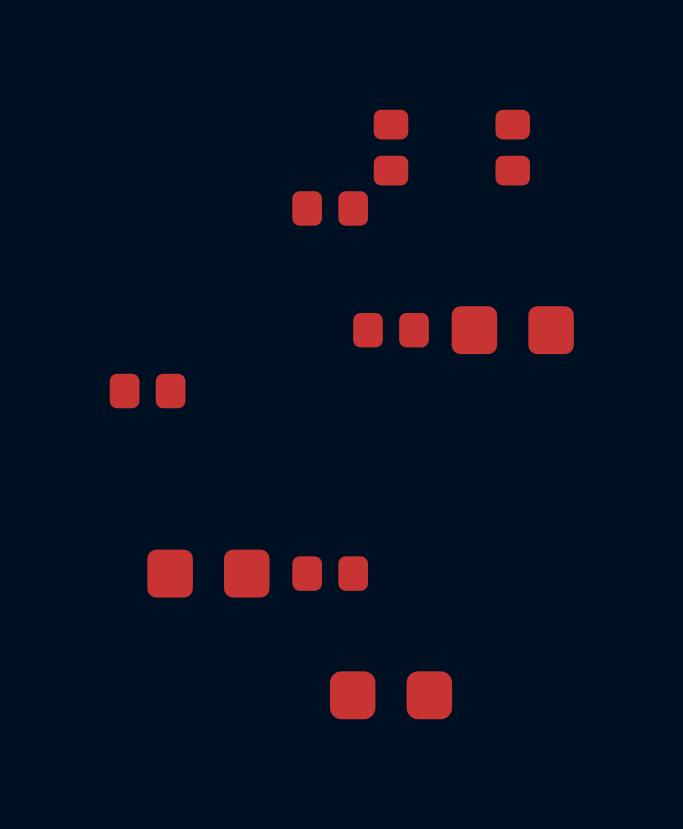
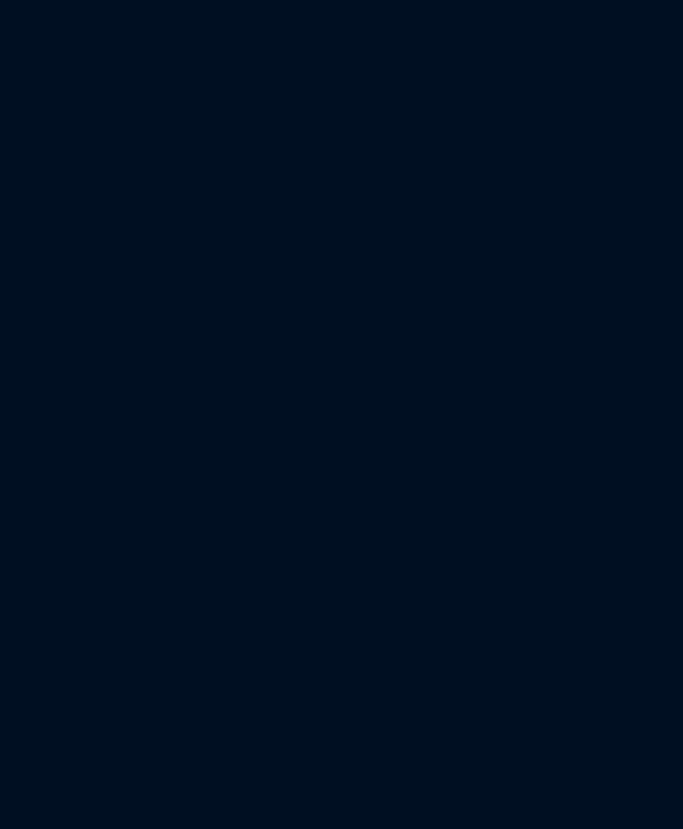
part: (391, 147) -> none
part: (512, 147) -> none
part: (330, 208) -> none
part: (391, 330) -> none
part: (512, 330) -> none
part: (147, 391) -> none
part: (208, 573) -> none
part: (330, 573) -> none
part: (391, 695) -> none

